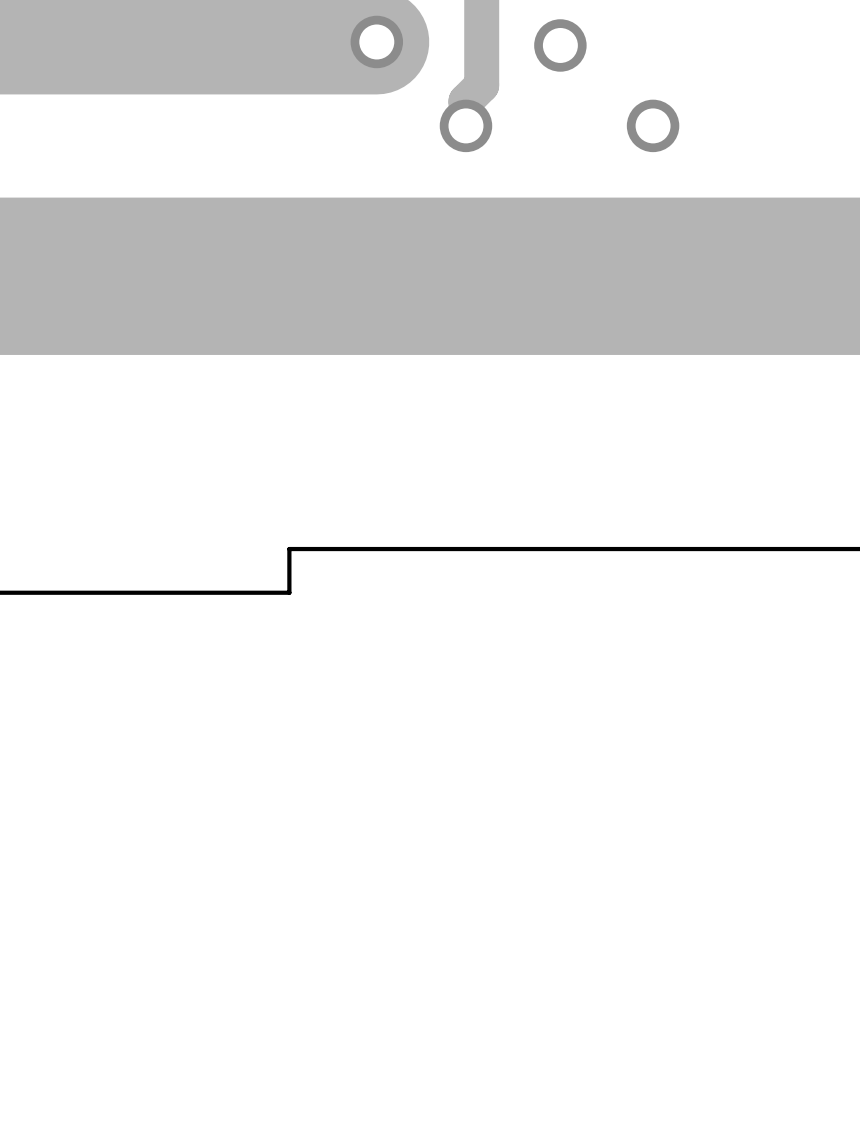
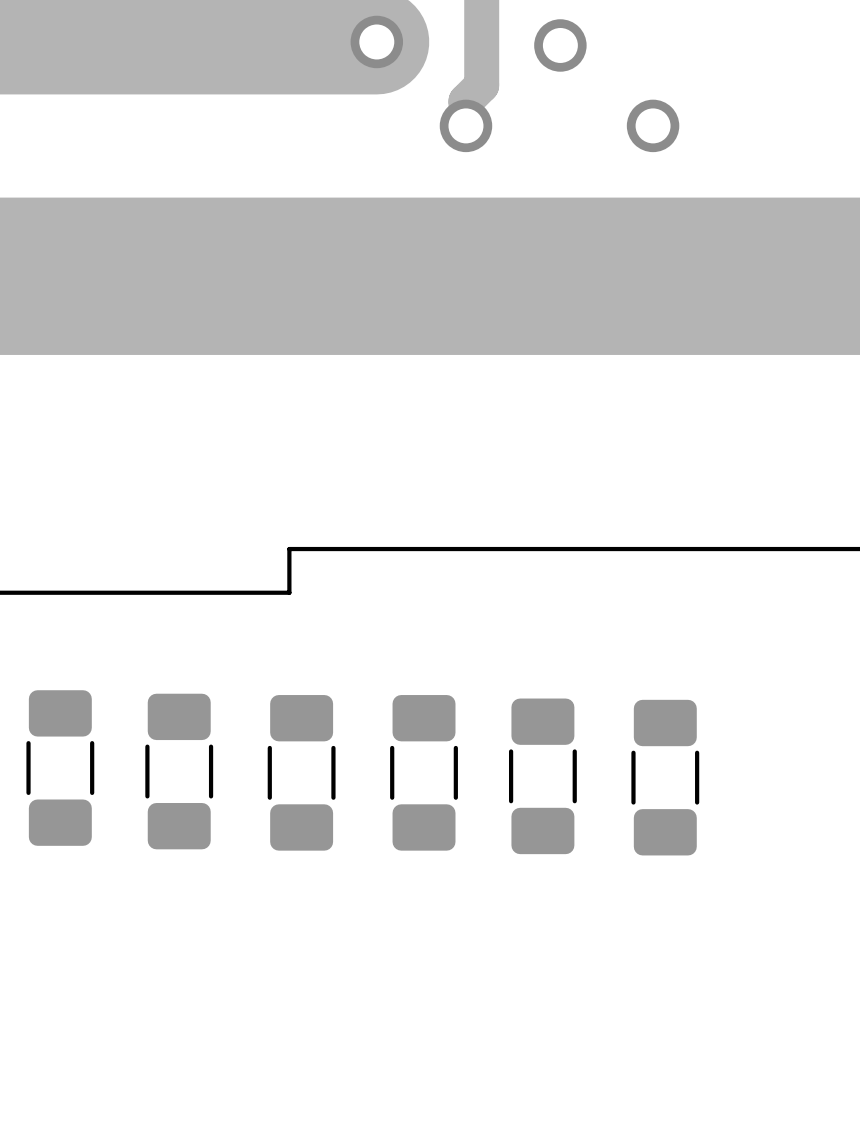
part: none -> (60, 768)
part: none -> (179, 771)
part: none -> (301, 772)
part: none -> (424, 772)
part: none -> (542, 776)
part: none -> (665, 777)

